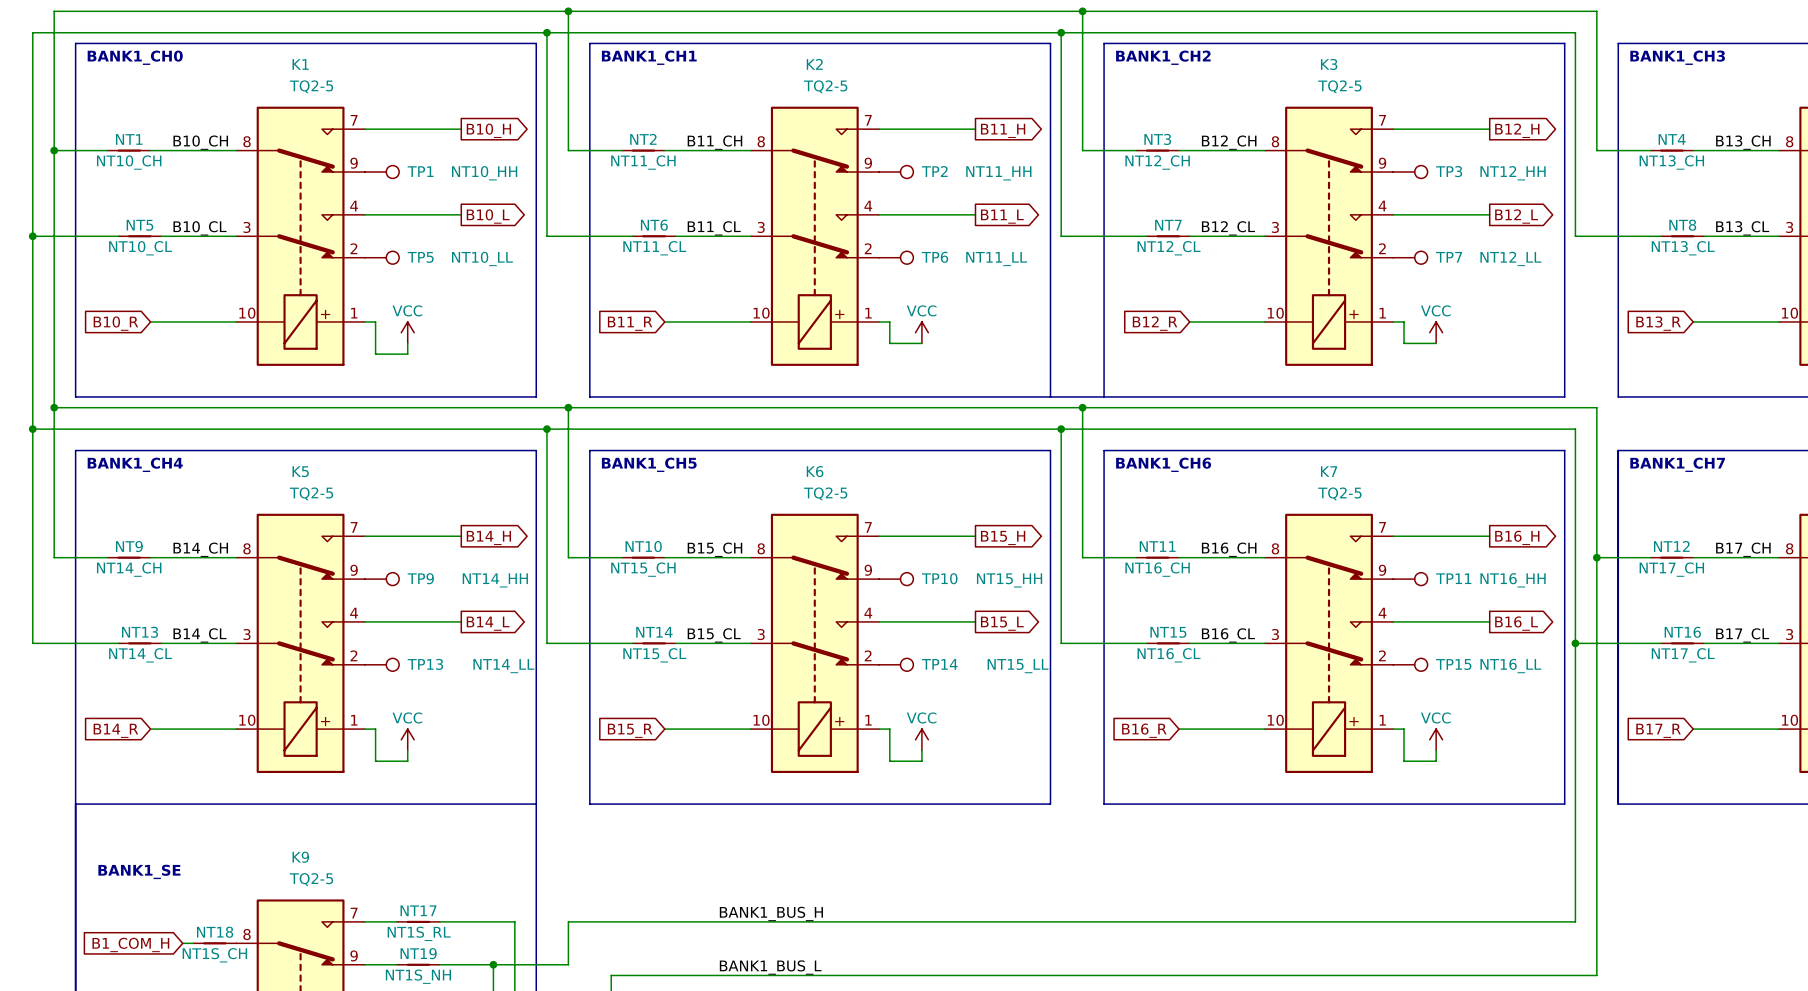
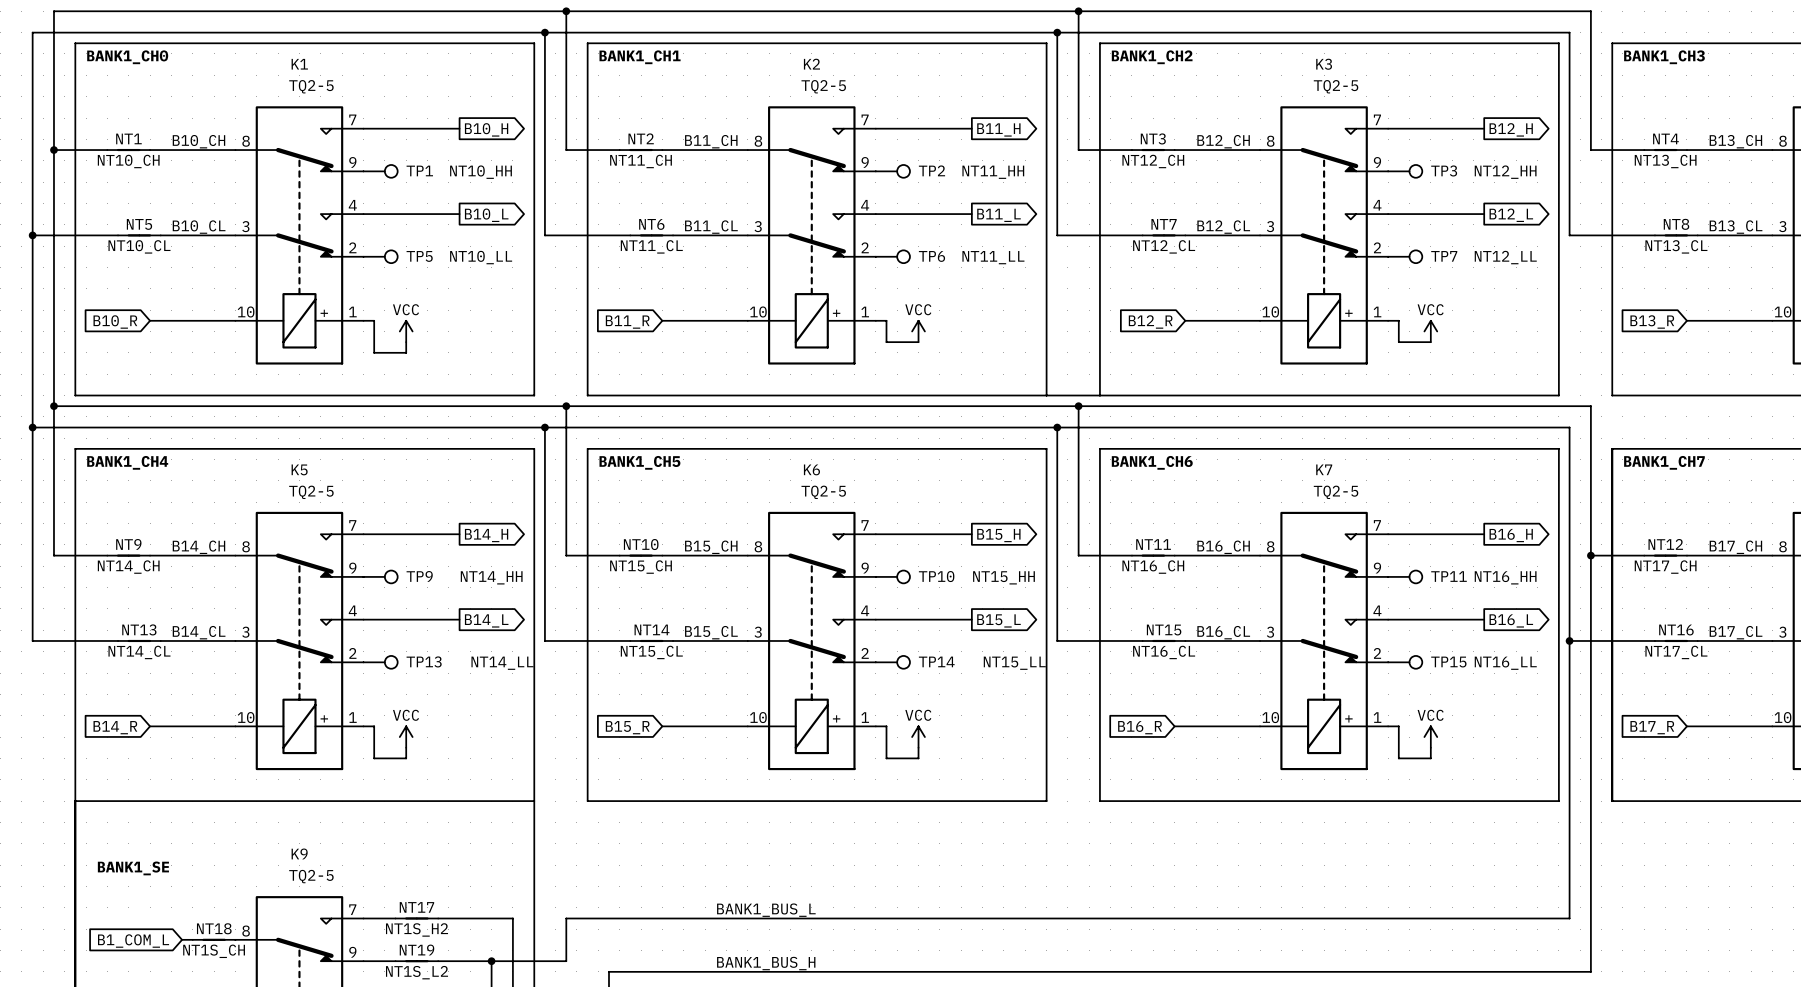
label: BANK1_BUS_H (771, 913) -> BANK1_BUS_L (766, 910)
NT17 value: NT1S_RL (419, 933) -> NT1S_H2 (417, 929)
global label: B1_COM_H (130, 944) -> B1_COM_L (133, 941)
label: BANK1_BUS_L (770, 967) -> BANK1_BUS_H (766, 963)
NT19 value: NT1S_NH (418, 976) -> NT1S_L2 (417, 972)

